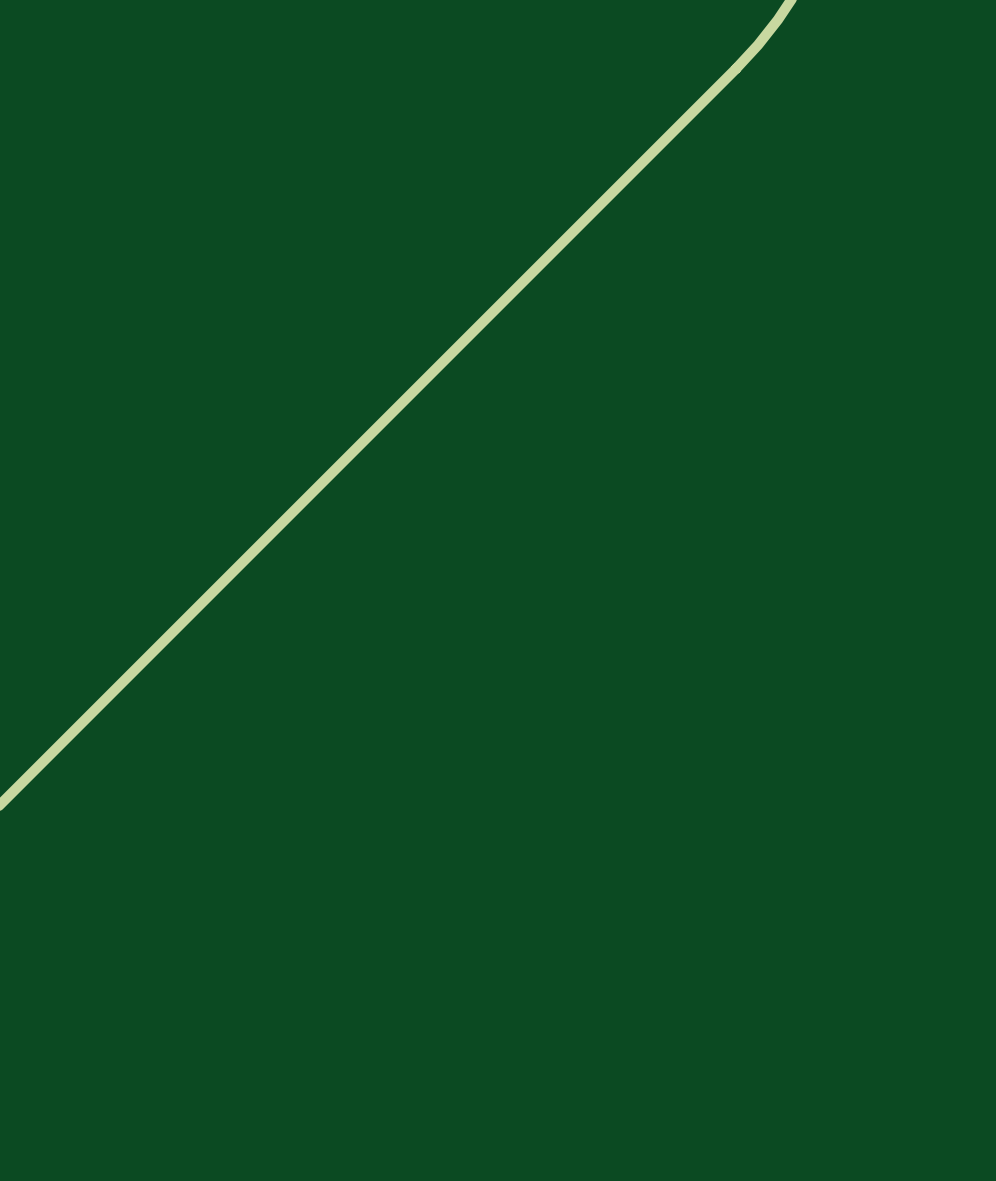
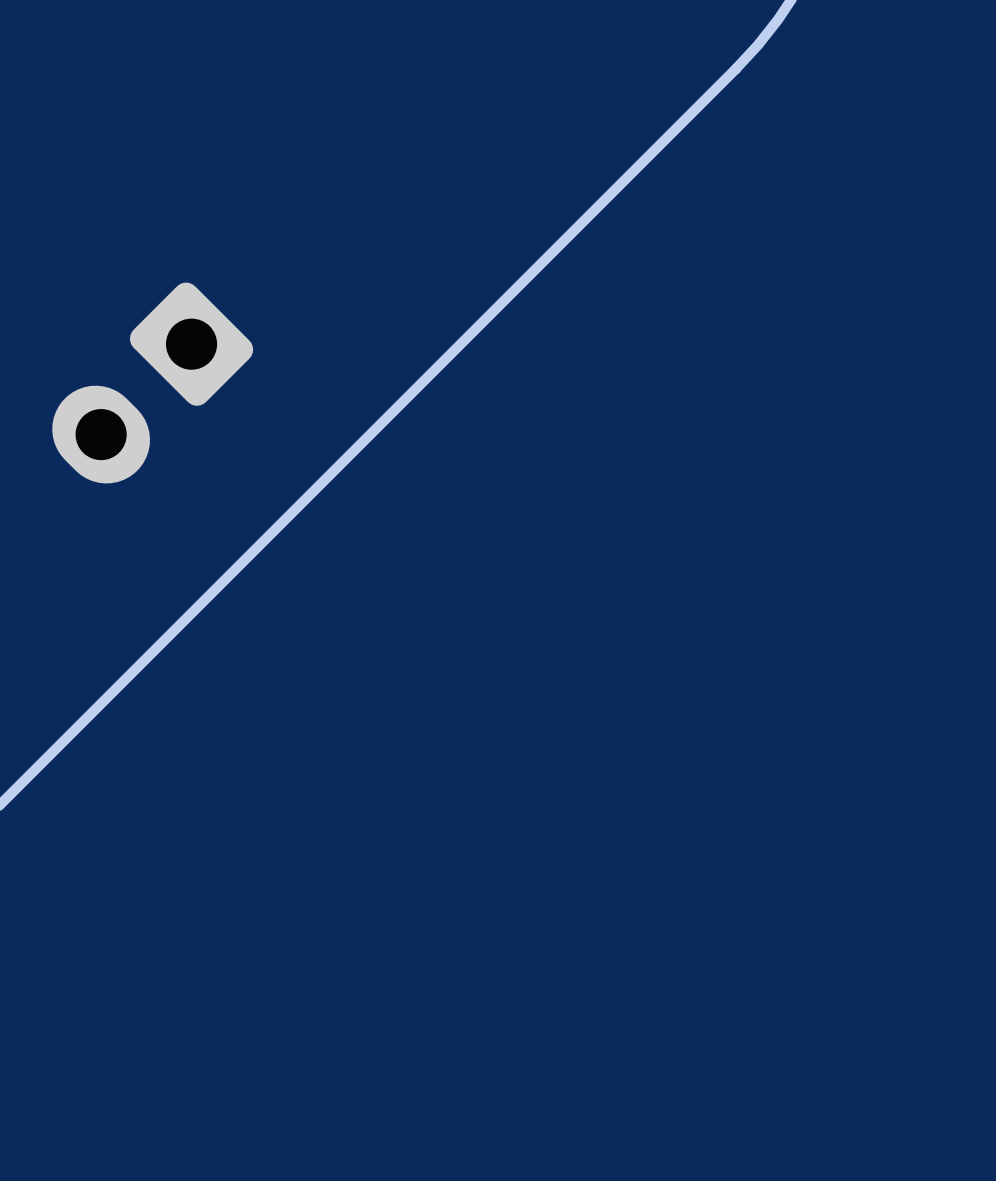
part: none -> (152, 383)

